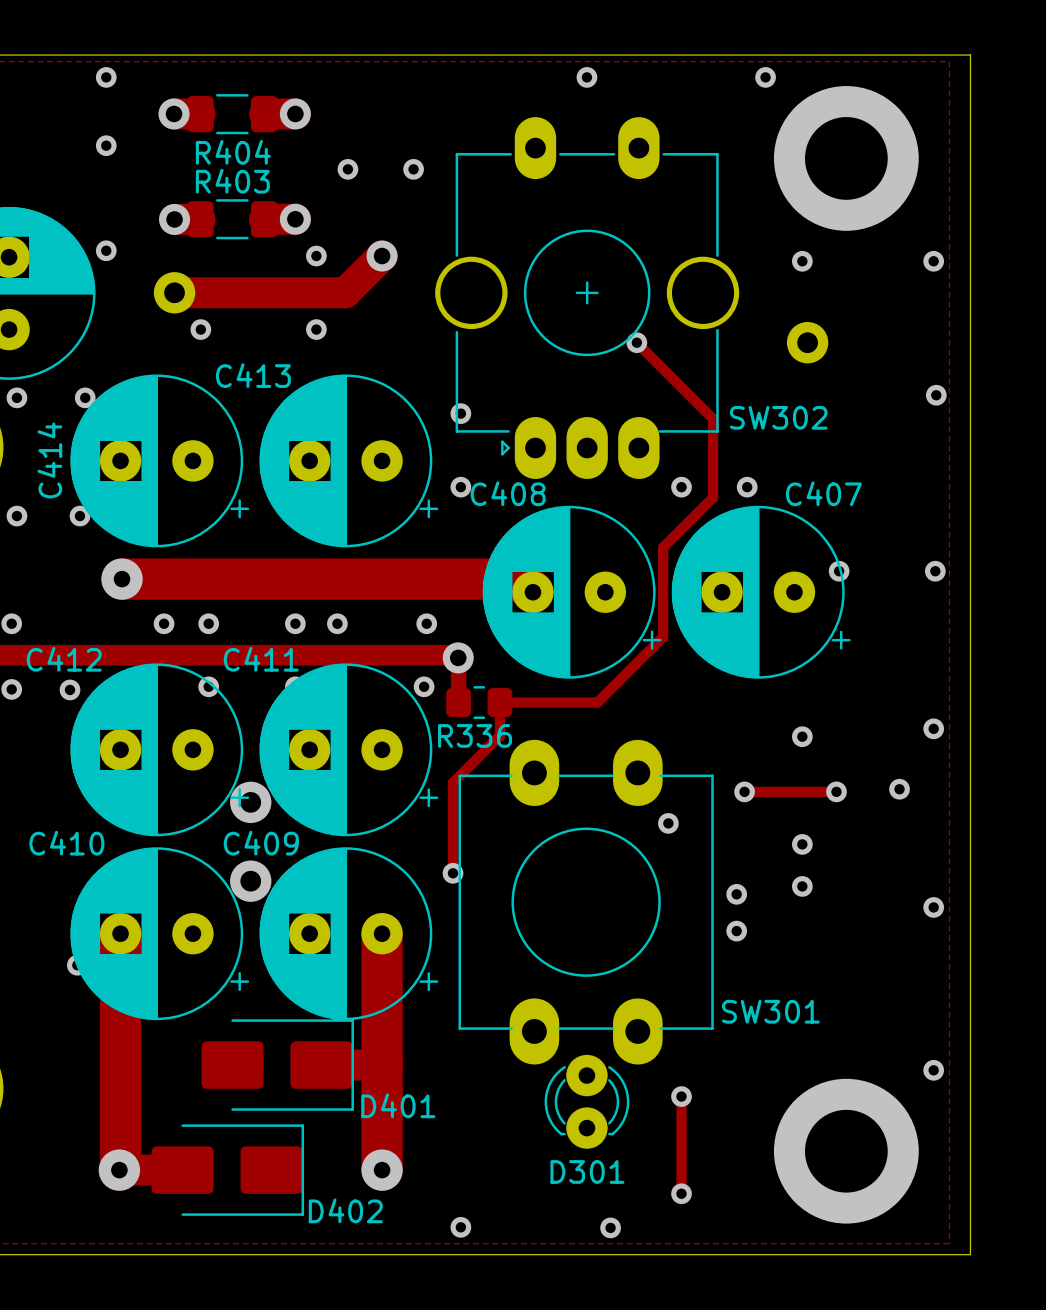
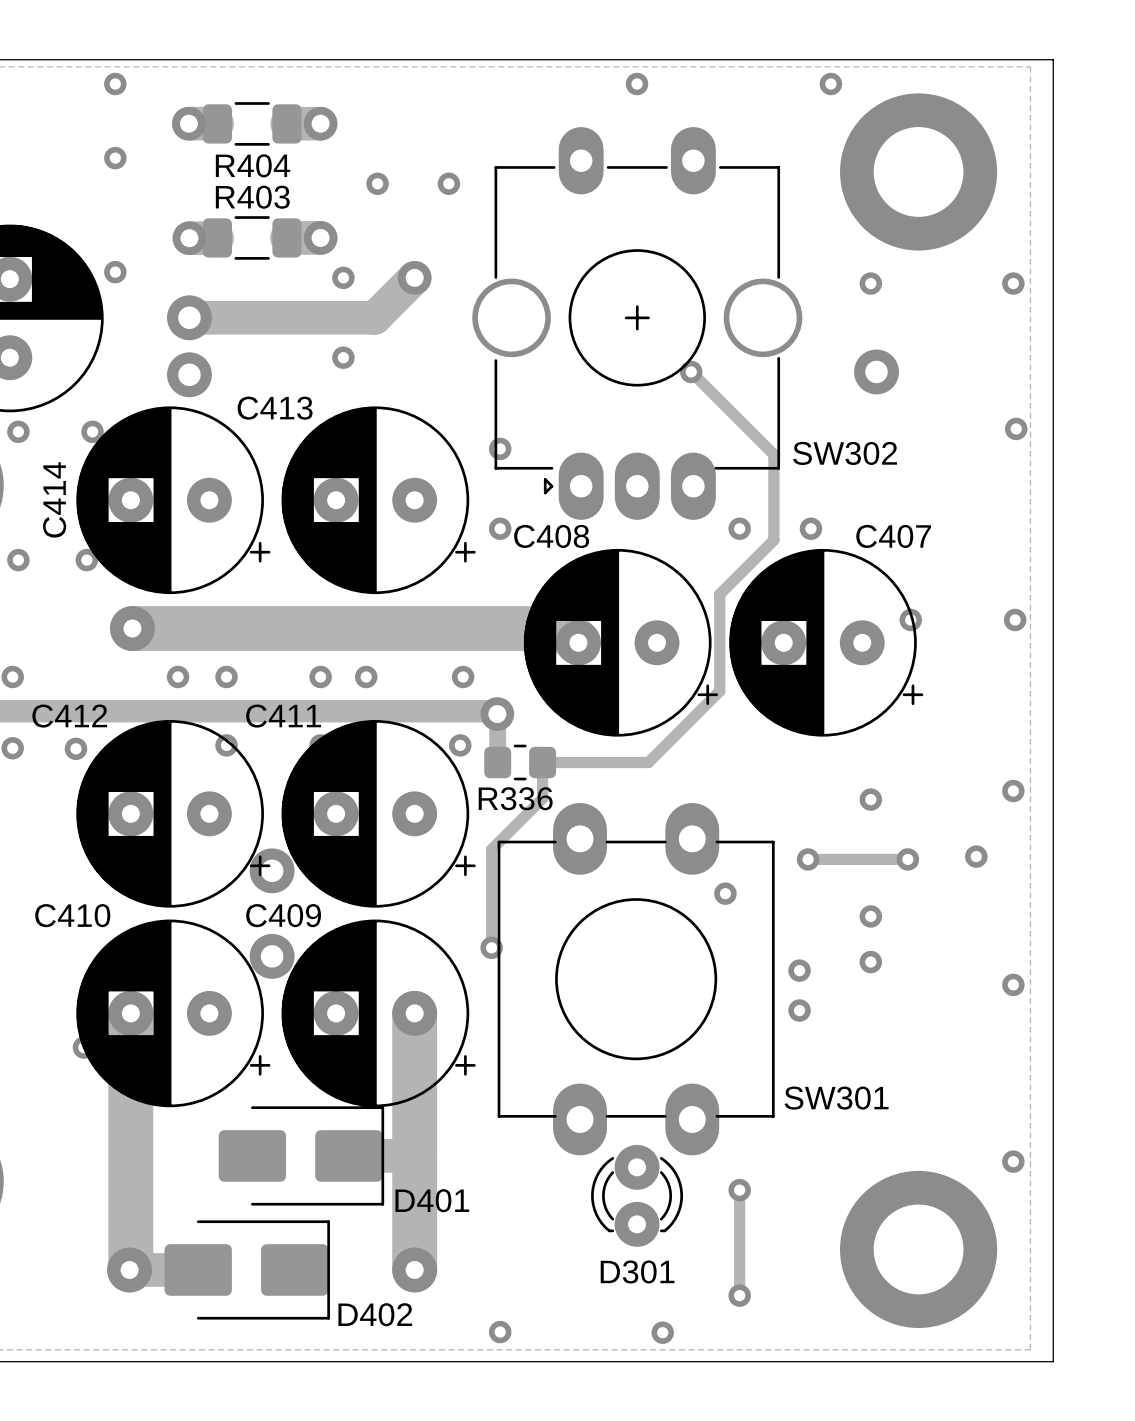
part: none -> (189, 346)
via: (200, 329) -> none

